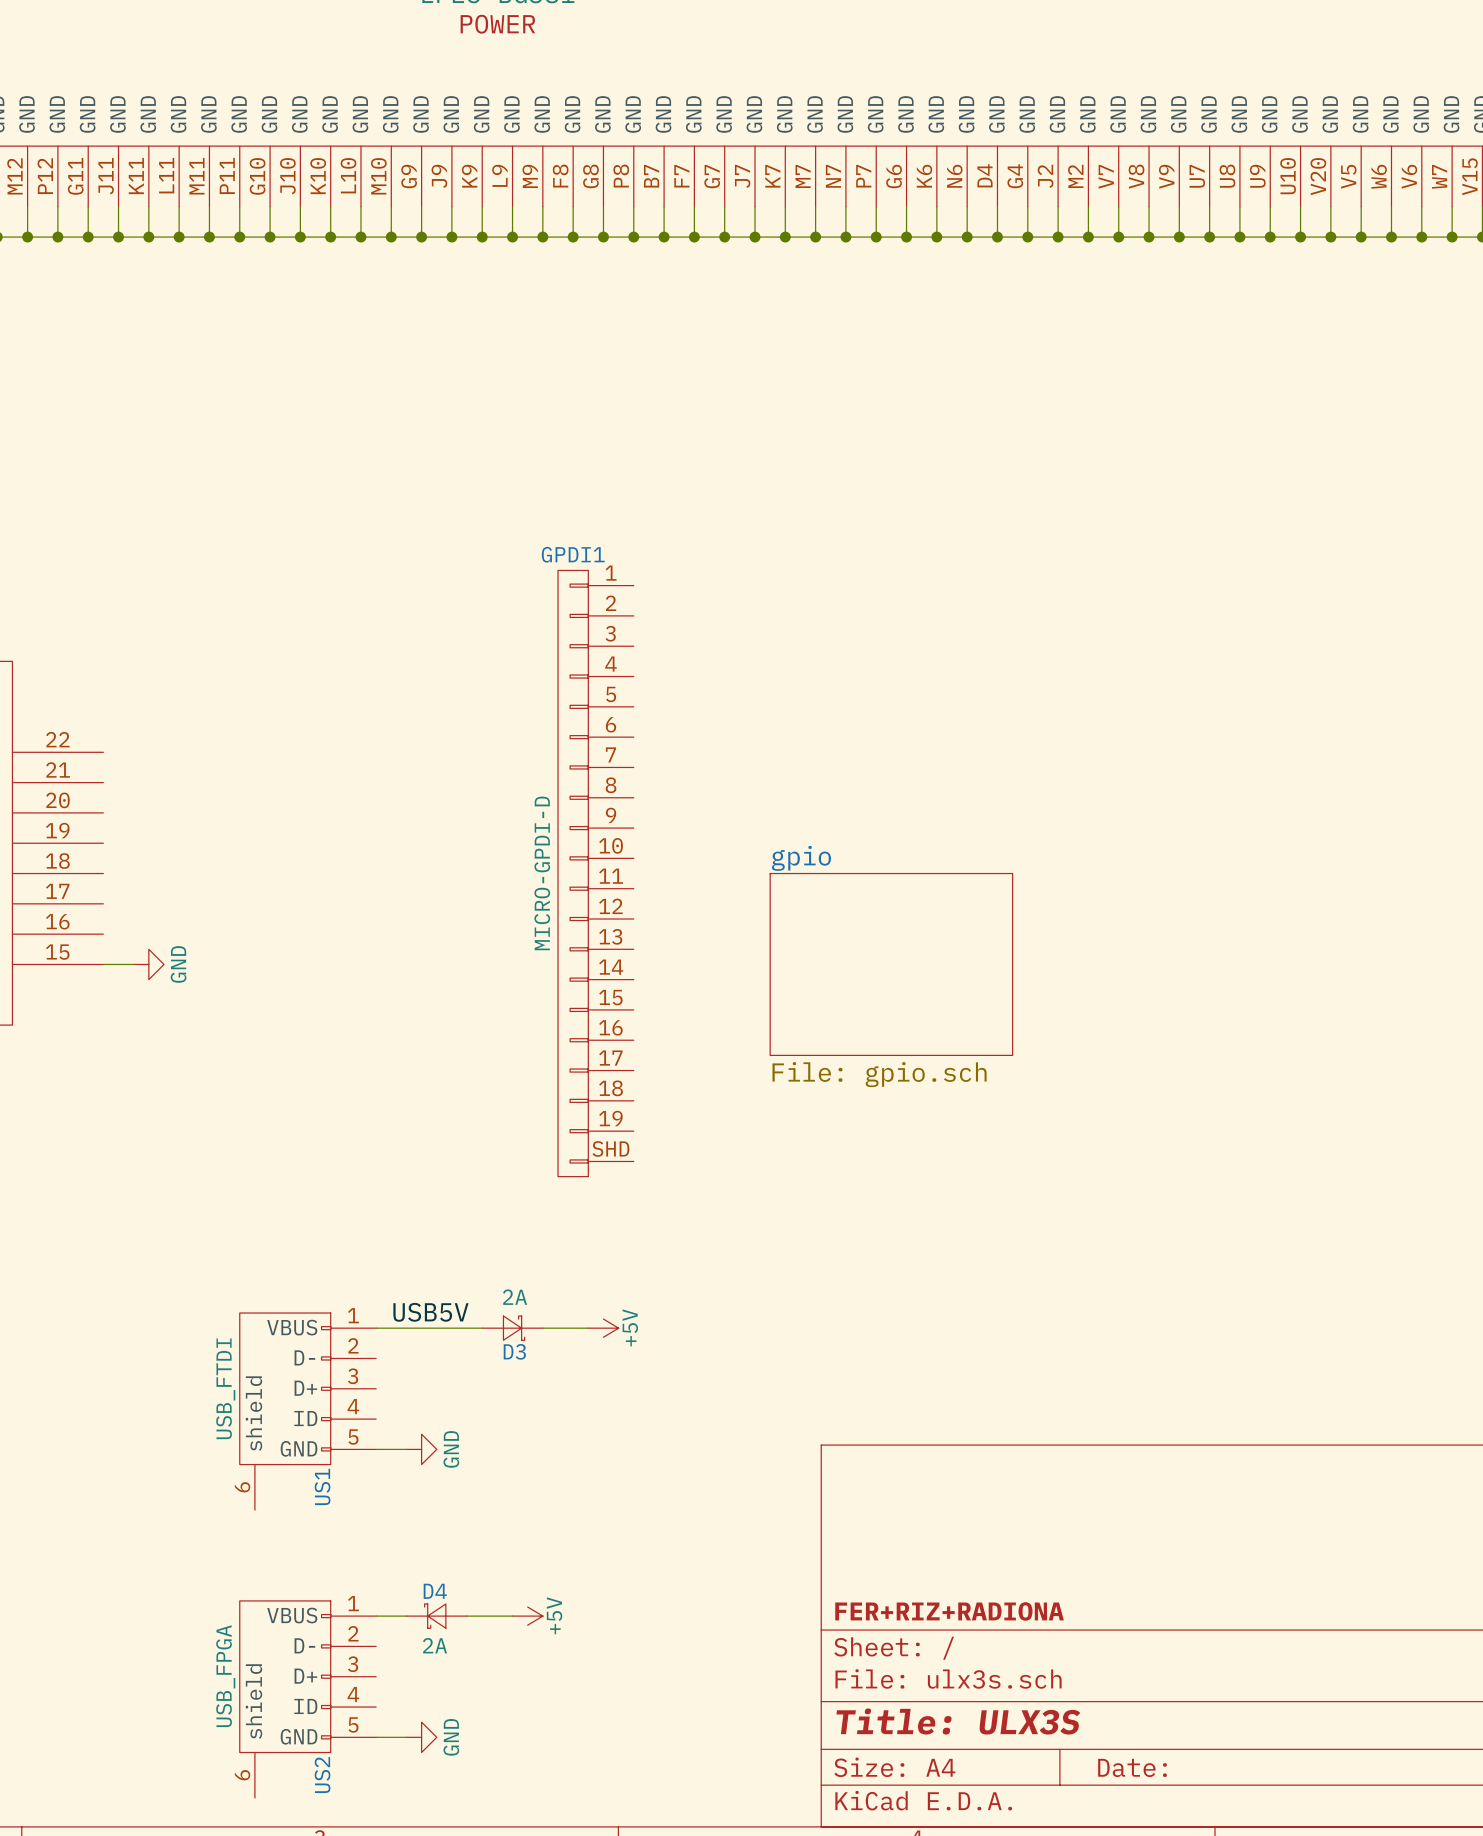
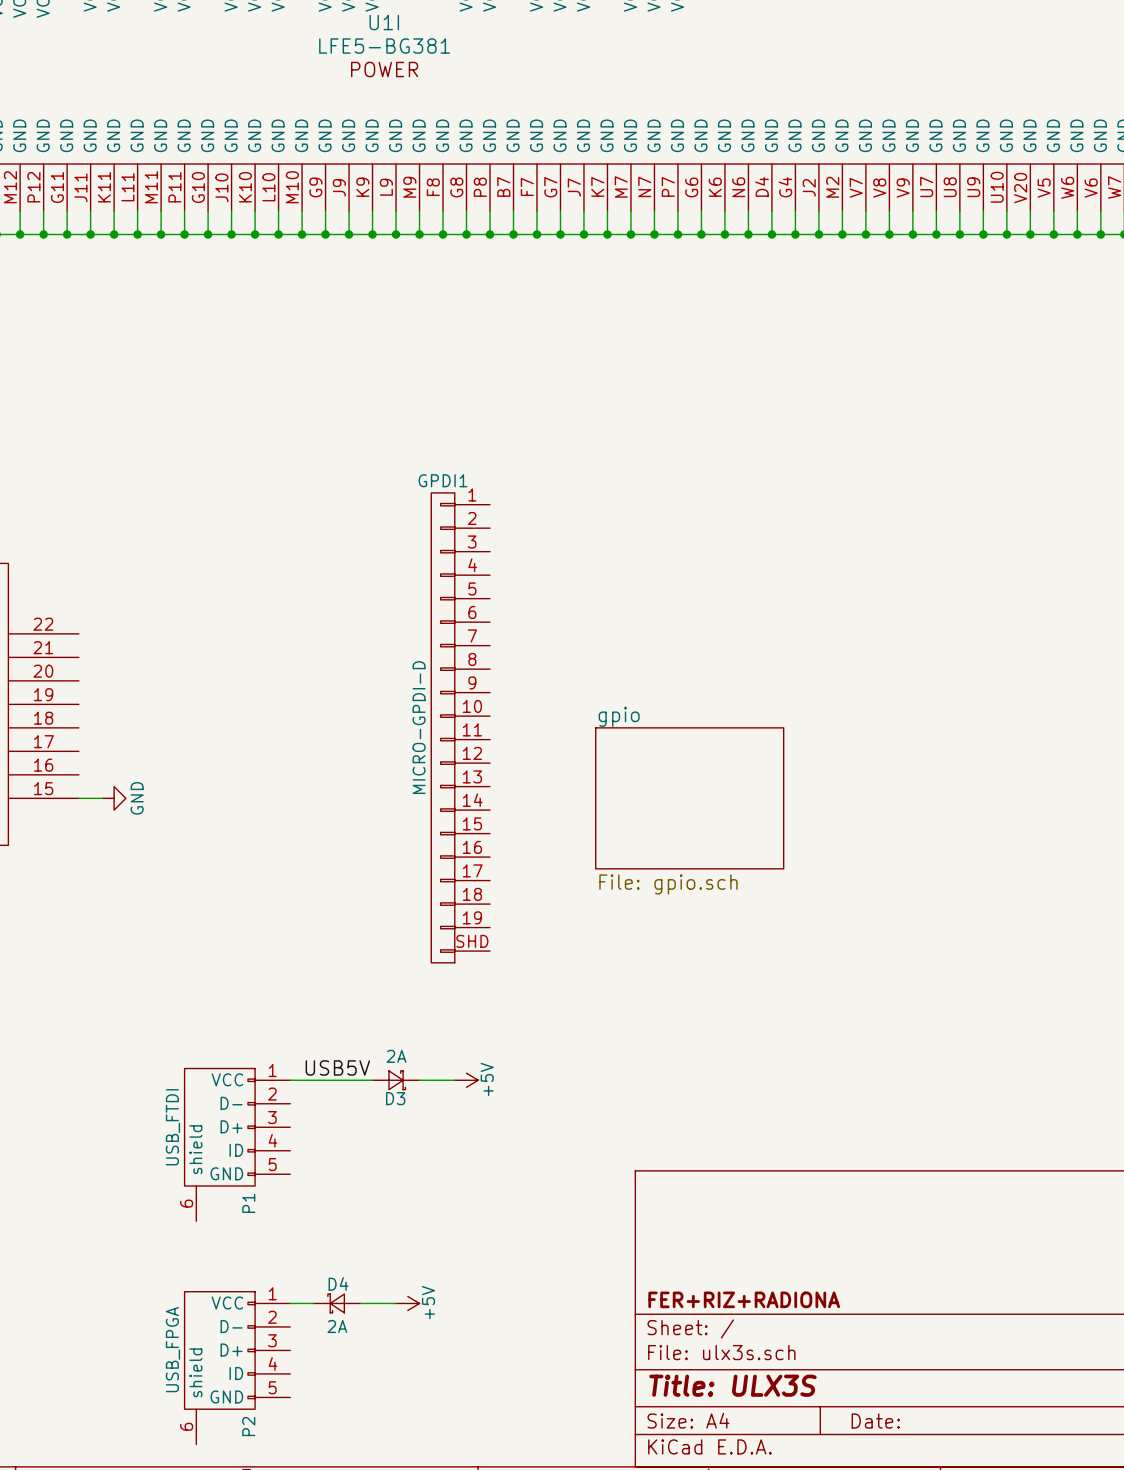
US1 pin name: VBUS (292, 1327) -> VCC (227, 1079)
wire: (376, 1449) (406, 1449) -> none
power symbol: GND (421, 1449) -> none
US1 name: US1 (322, 1486) -> P1 (248, 1203)
US2 pin name: VBUS (292, 1615) -> VCC (227, 1303)
wire: (376, 1737) (406, 1737) -> none
power symbol: GND (421, 1737) -> none
US2 name: US2 (322, 1775) -> P2 (248, 1426)

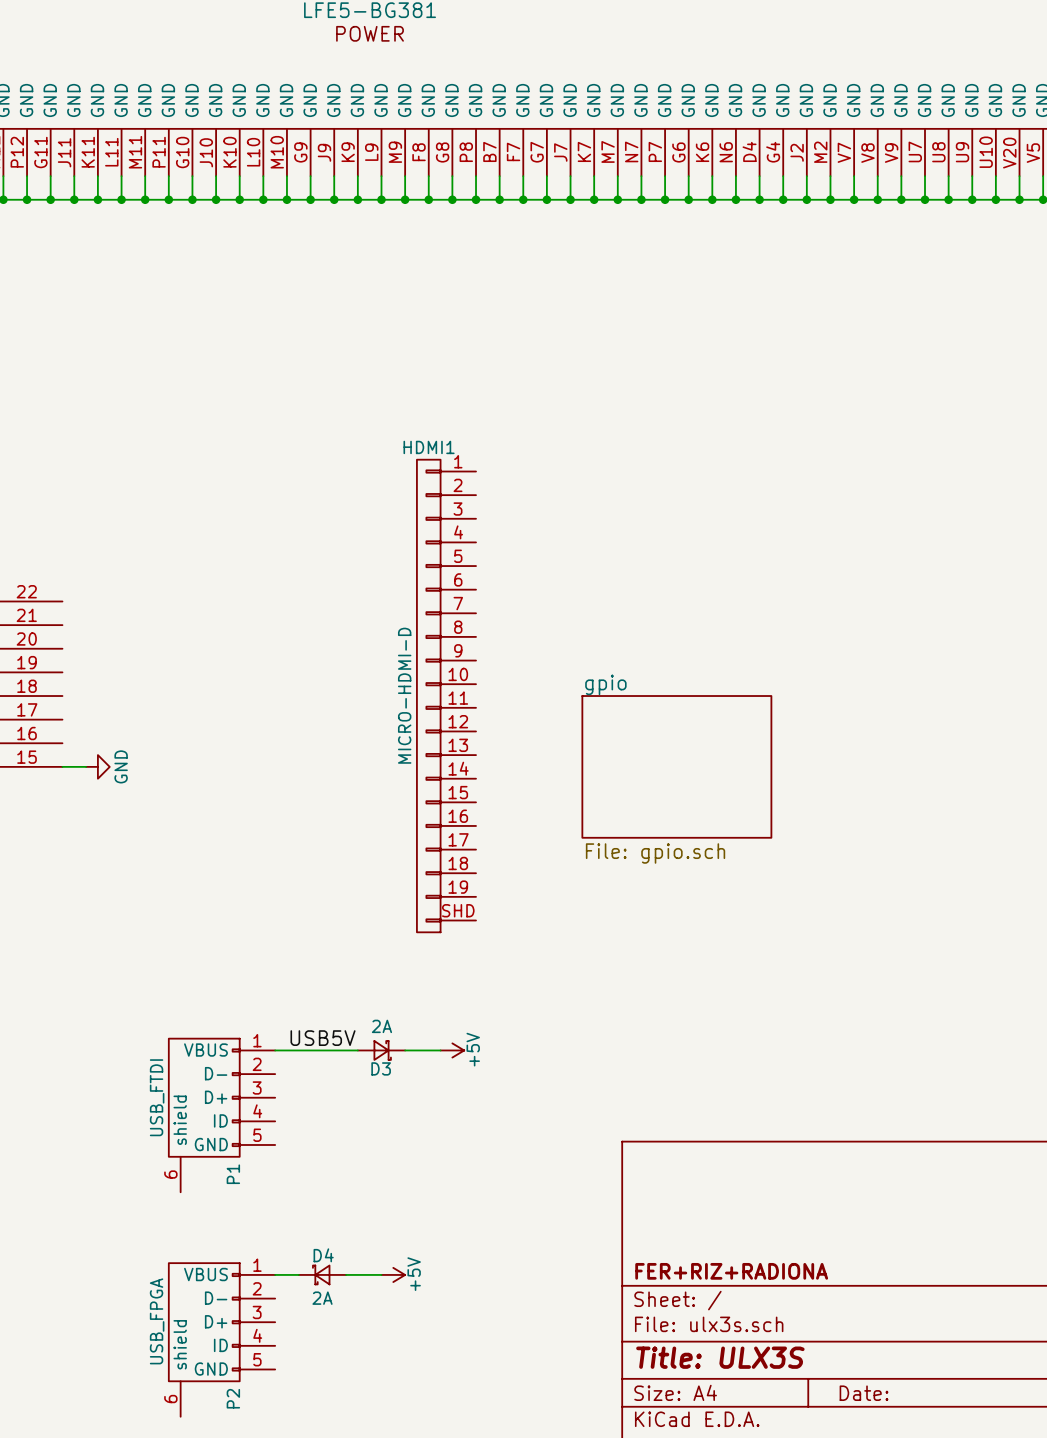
GPDI1 name: GPDI1 (443, 480) -> HDMI1 (429, 447)
GPDI1 value: MICRO-GPDI-D (419, 727) -> MICRO-HDMI-D (404, 695)
P1 pin name: VCC (227, 1079) -> VBUS (205, 1050)
P2 pin name: VCC (227, 1303) -> VBUS (205, 1274)

